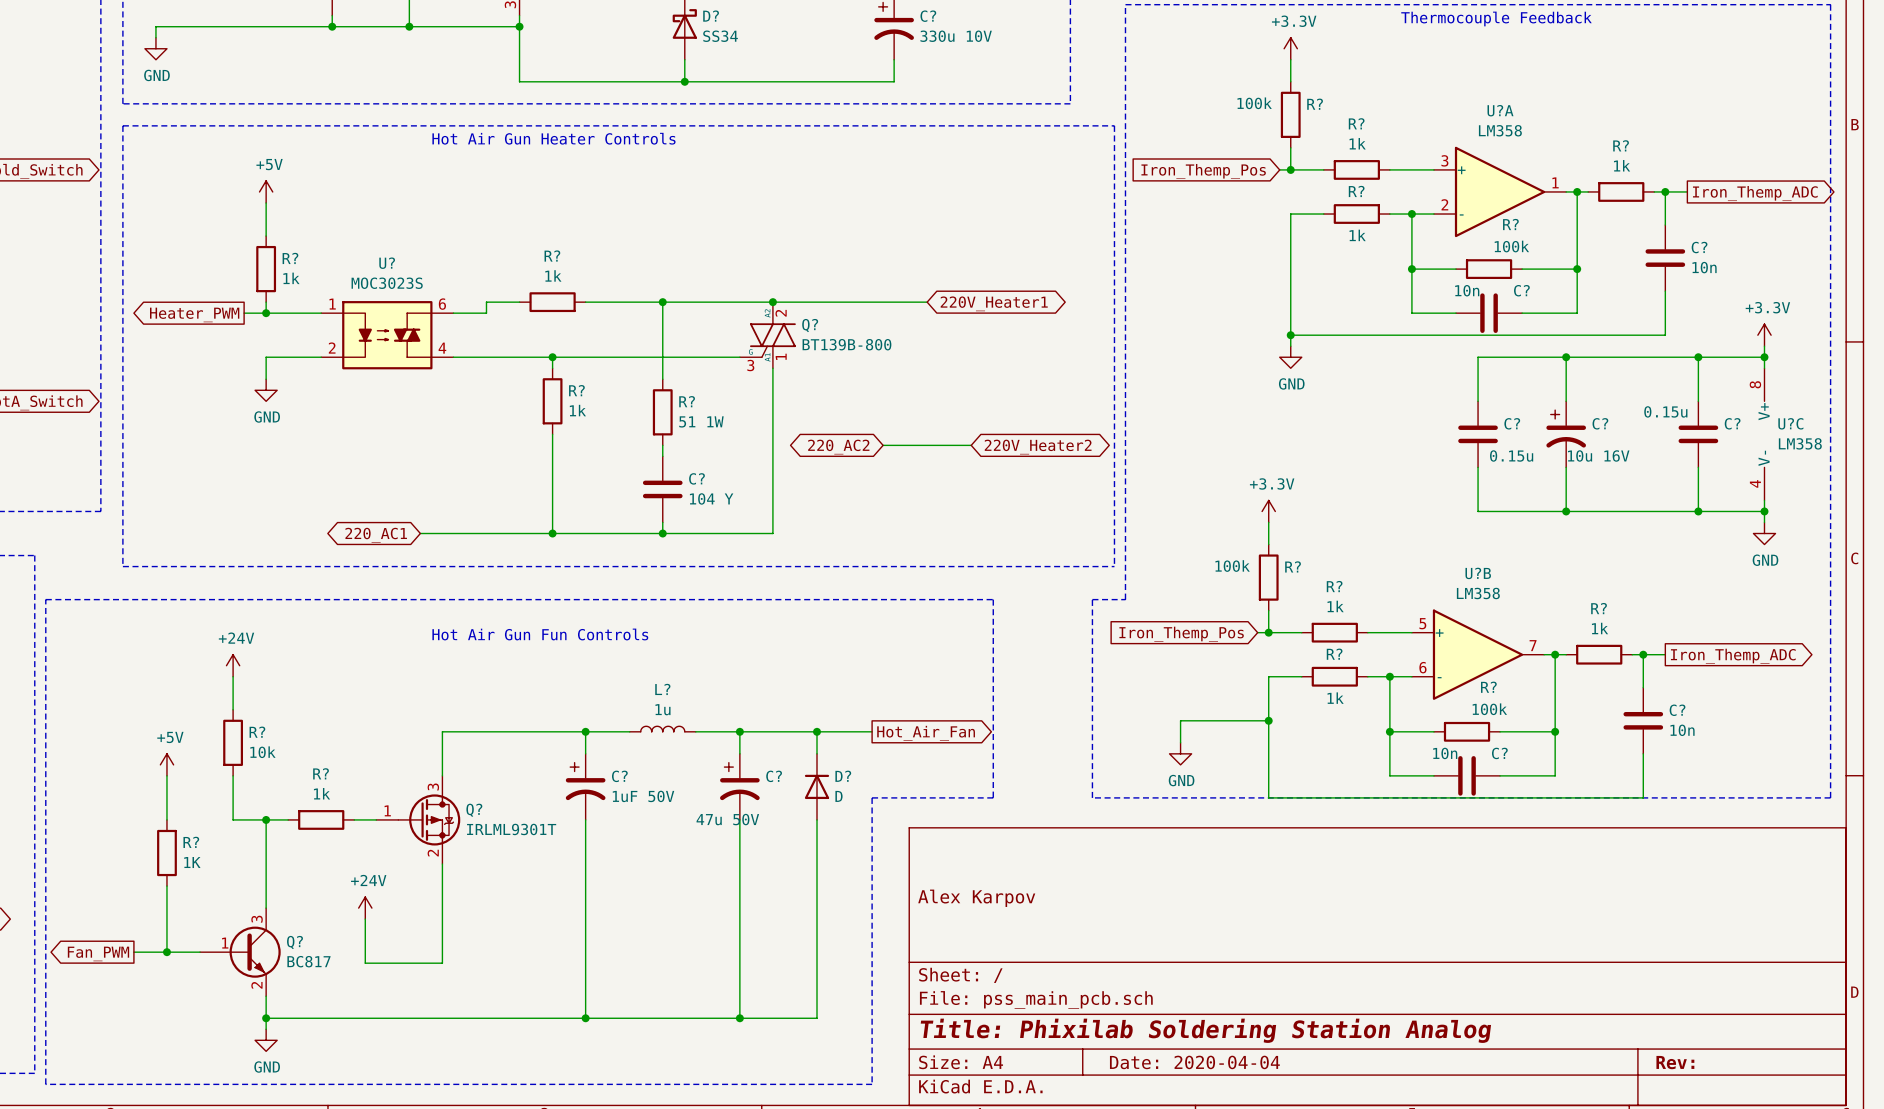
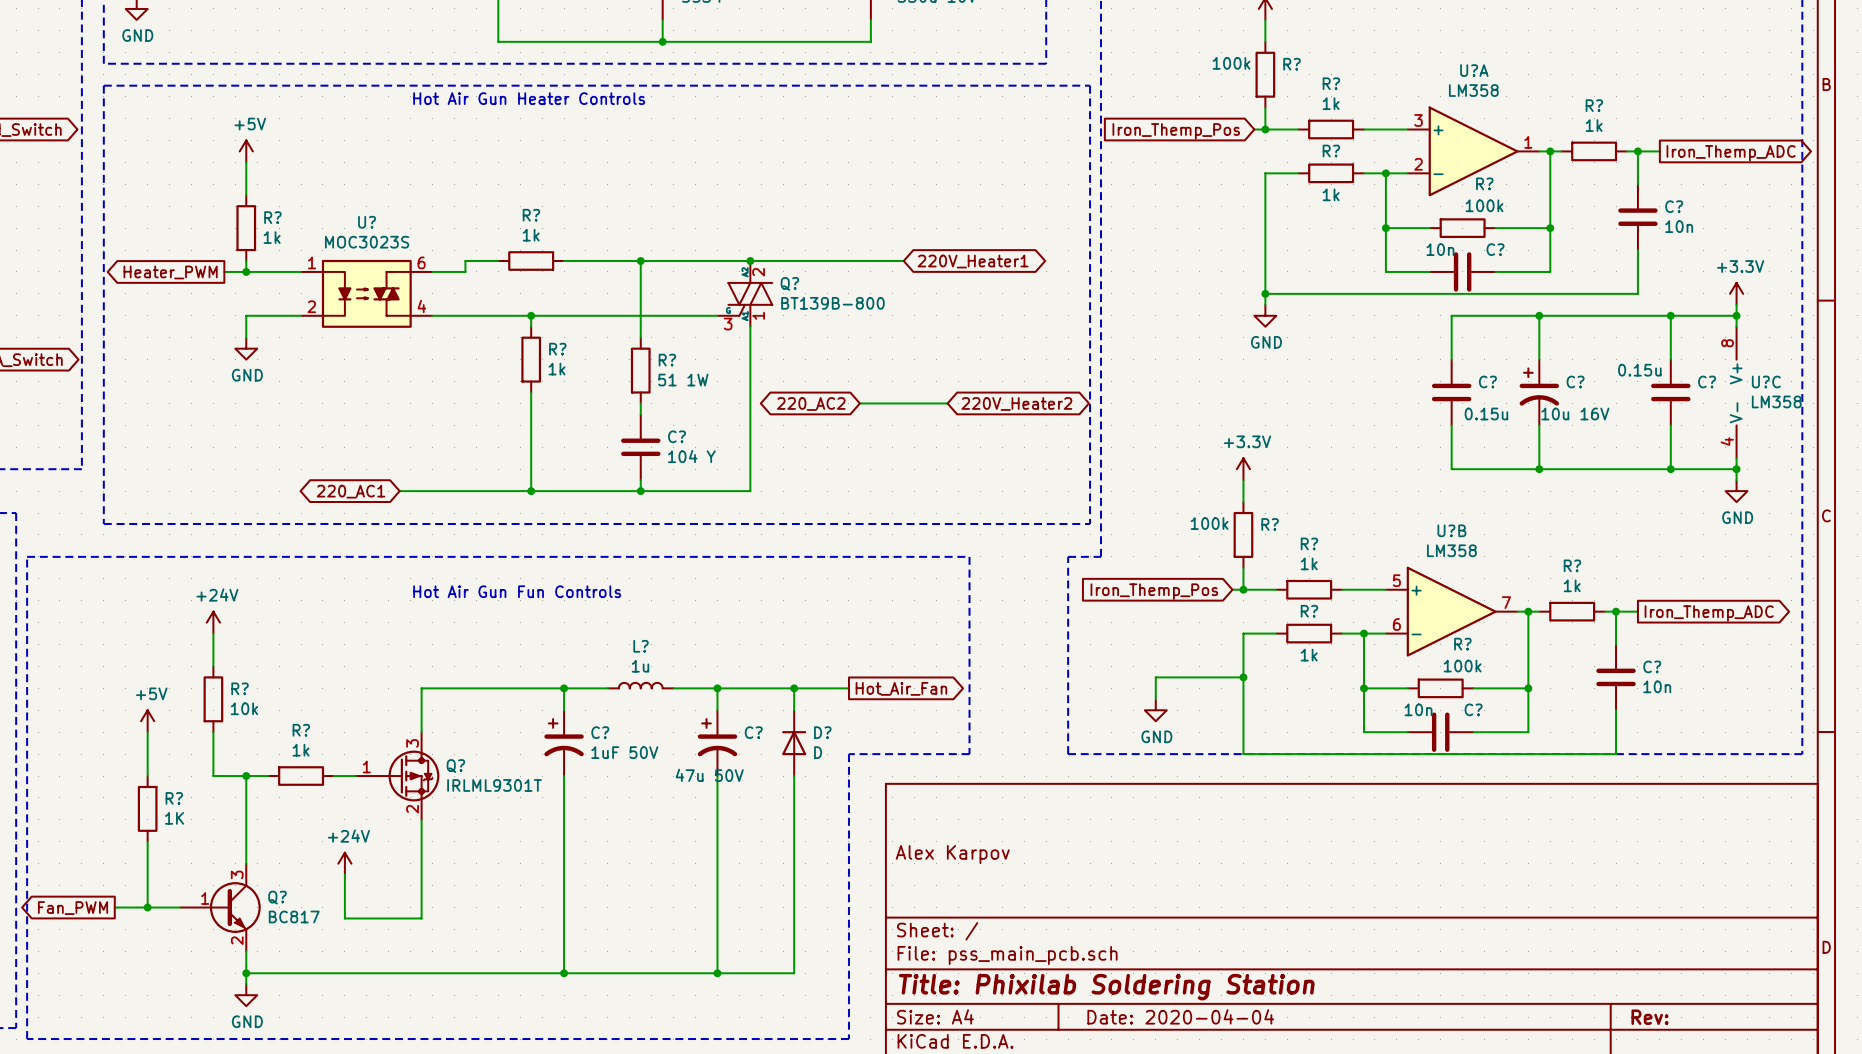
title block: Title: Phixilab Soldering Station Analog (1205, 1030) -> Title: Phixilab Soldering Station (1106, 987)

